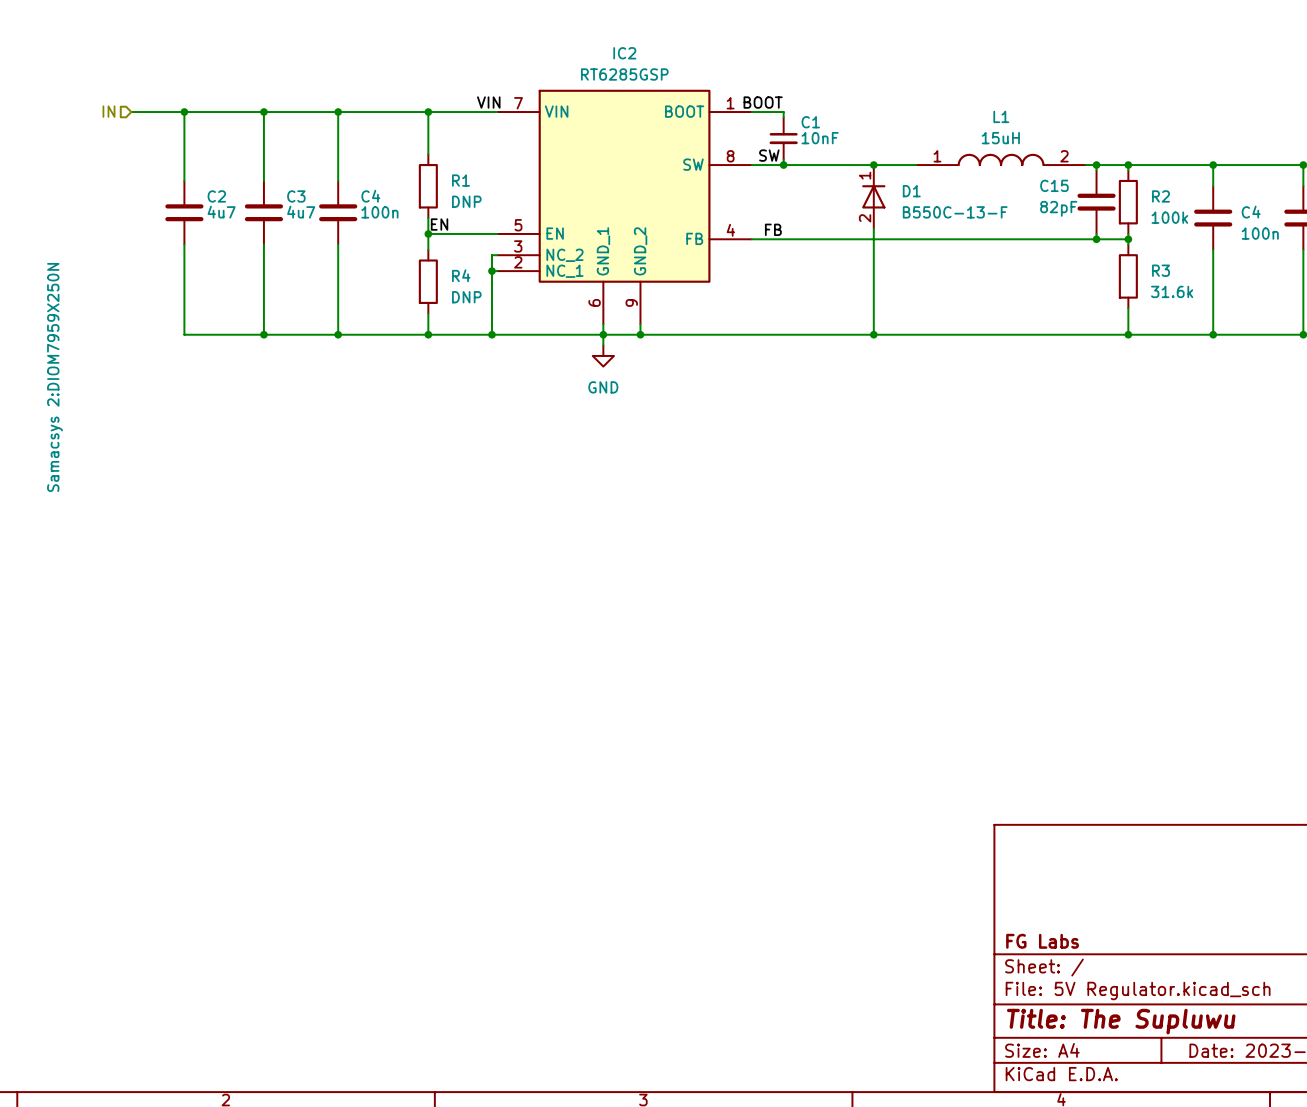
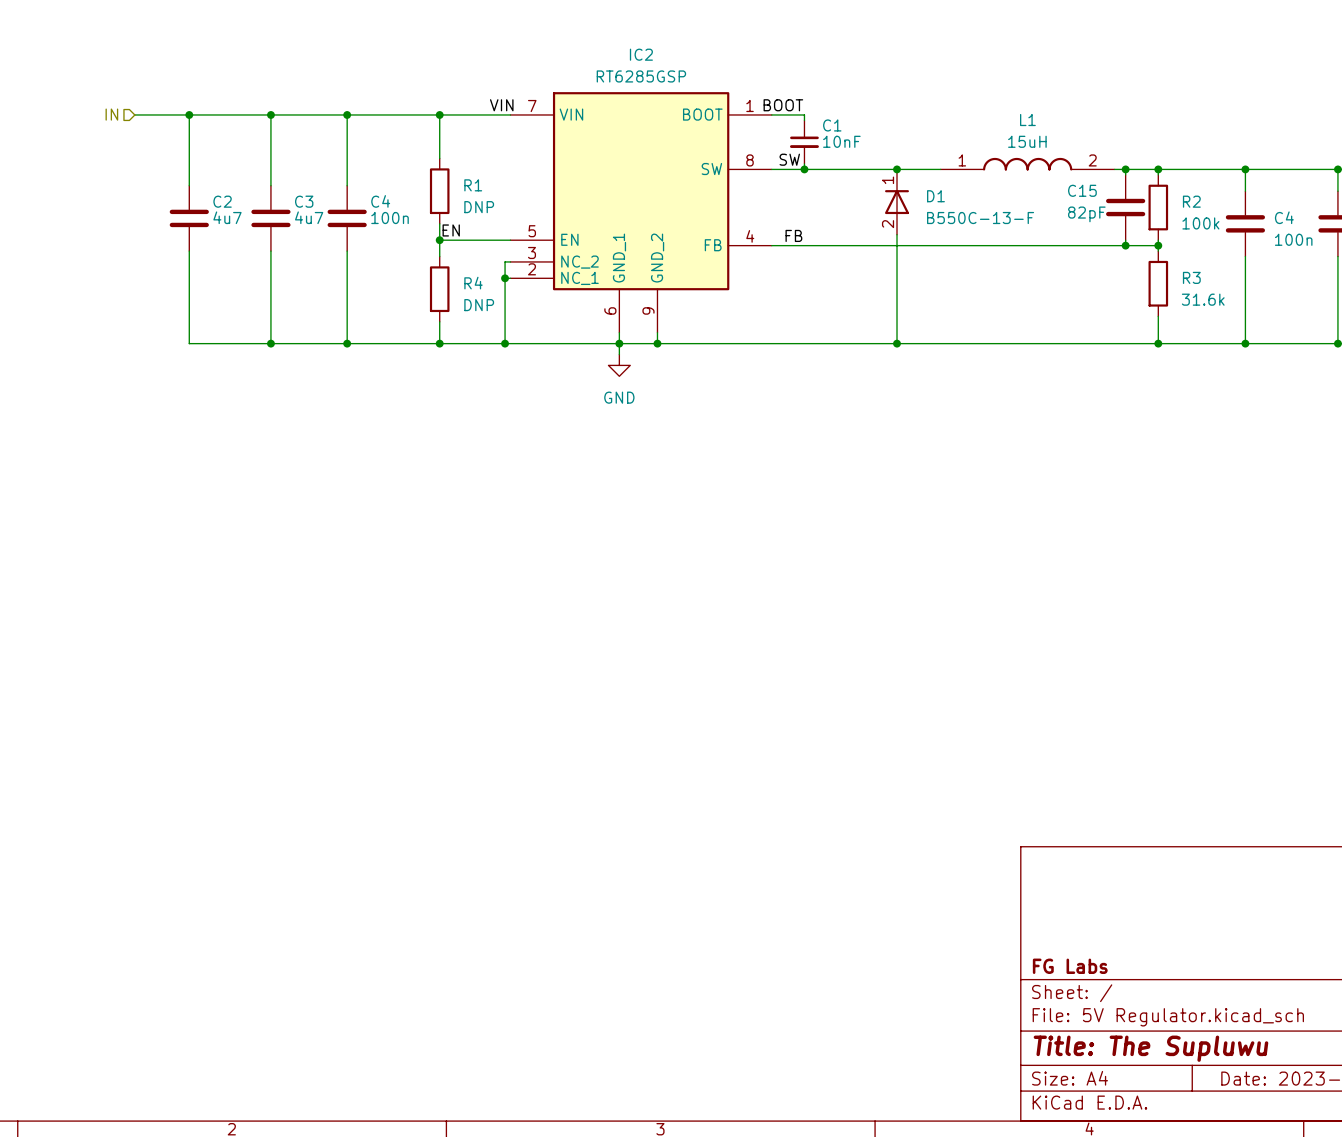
D1 text: Samacsys 2:DIOM7959X250N (55, 377) -> none

